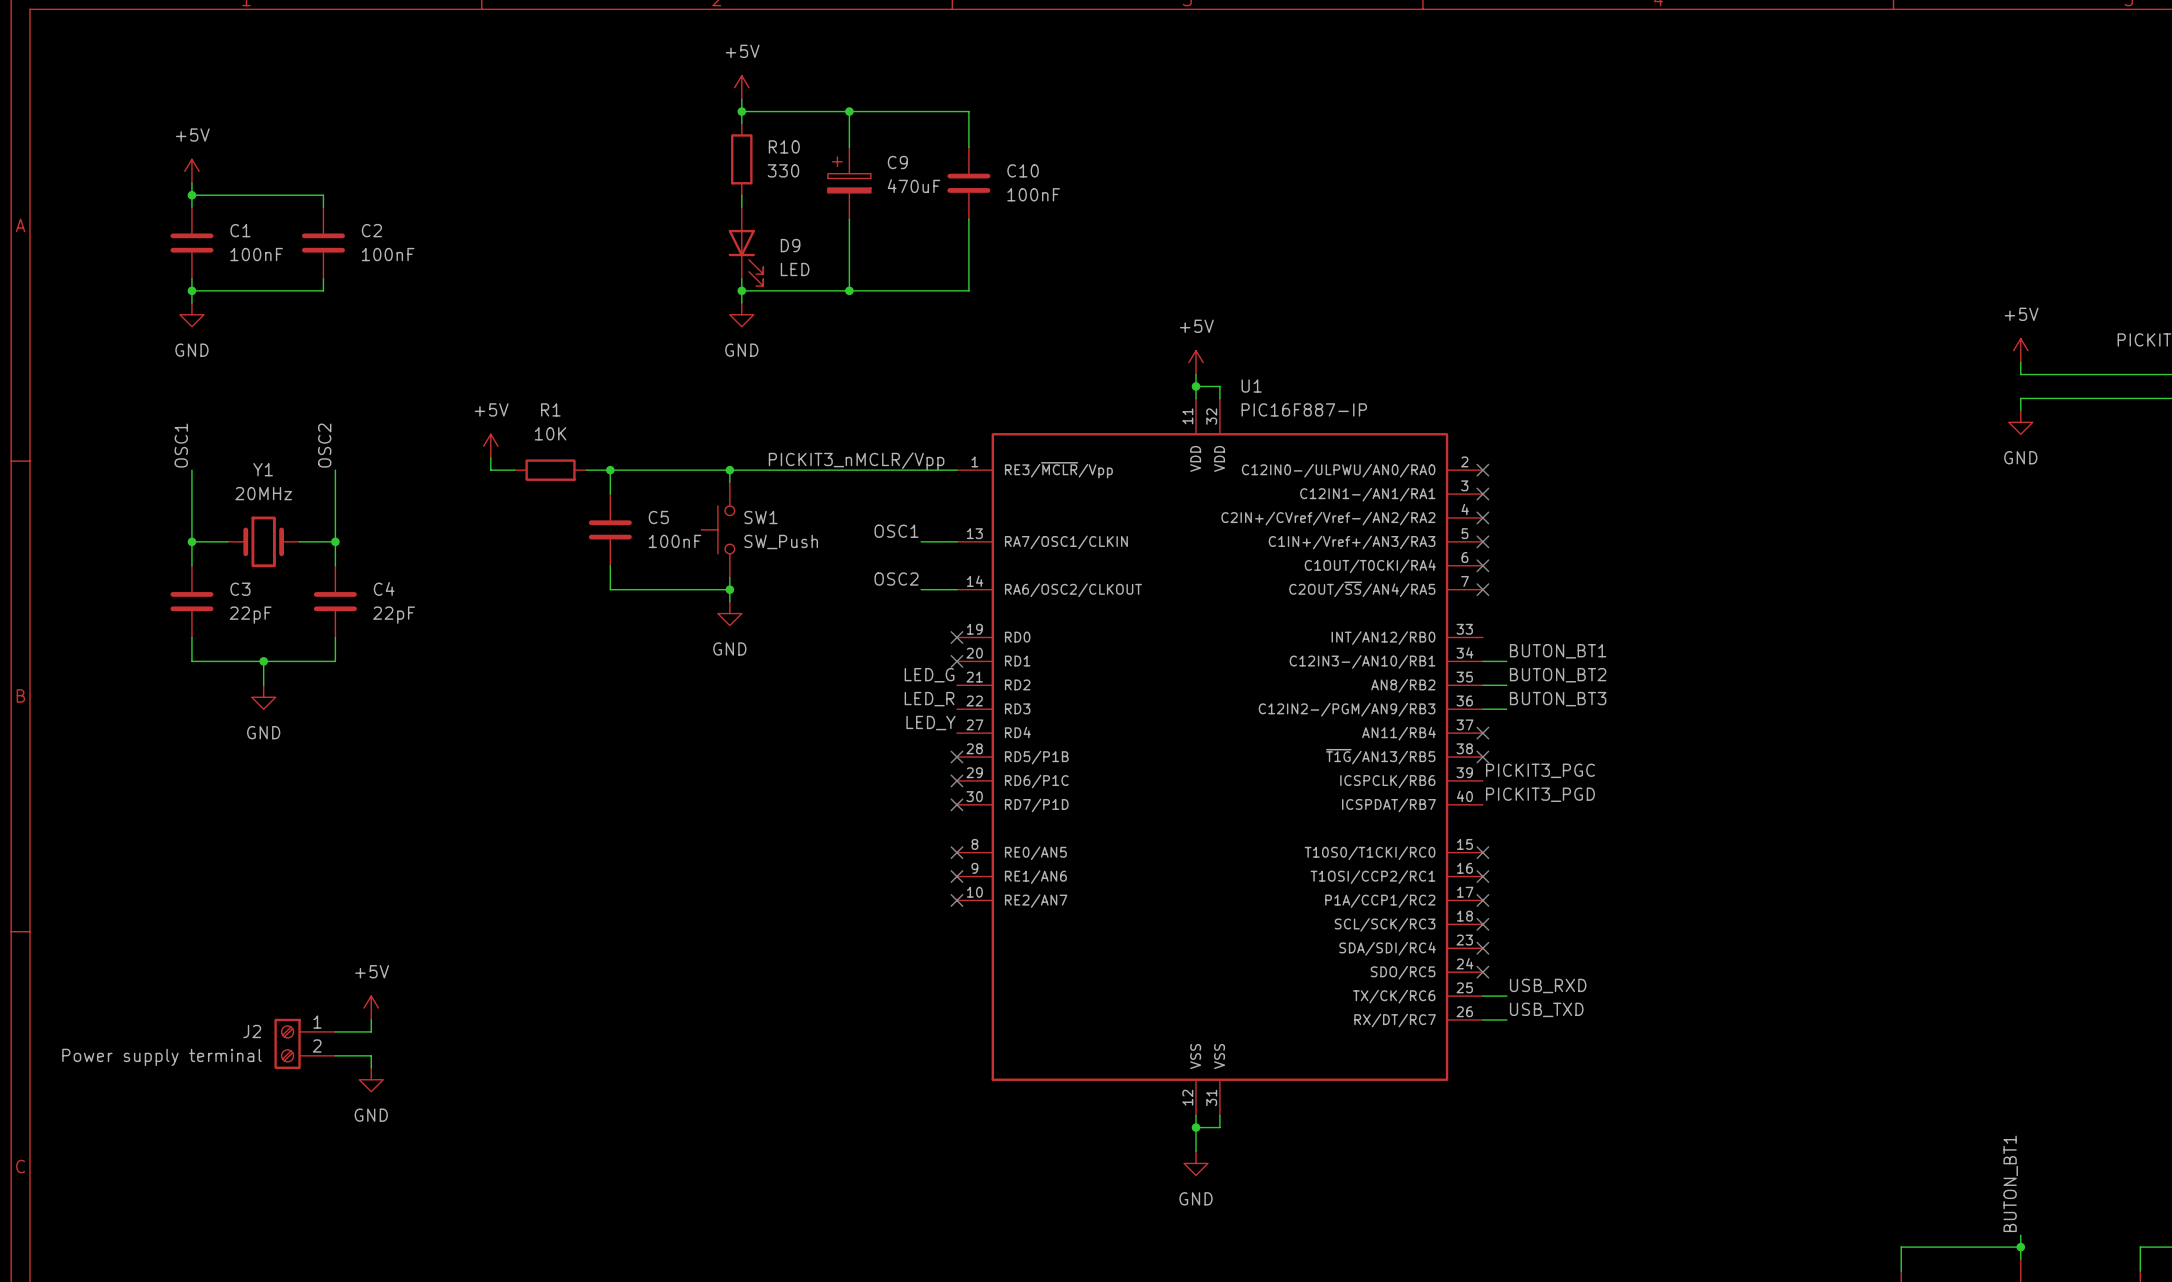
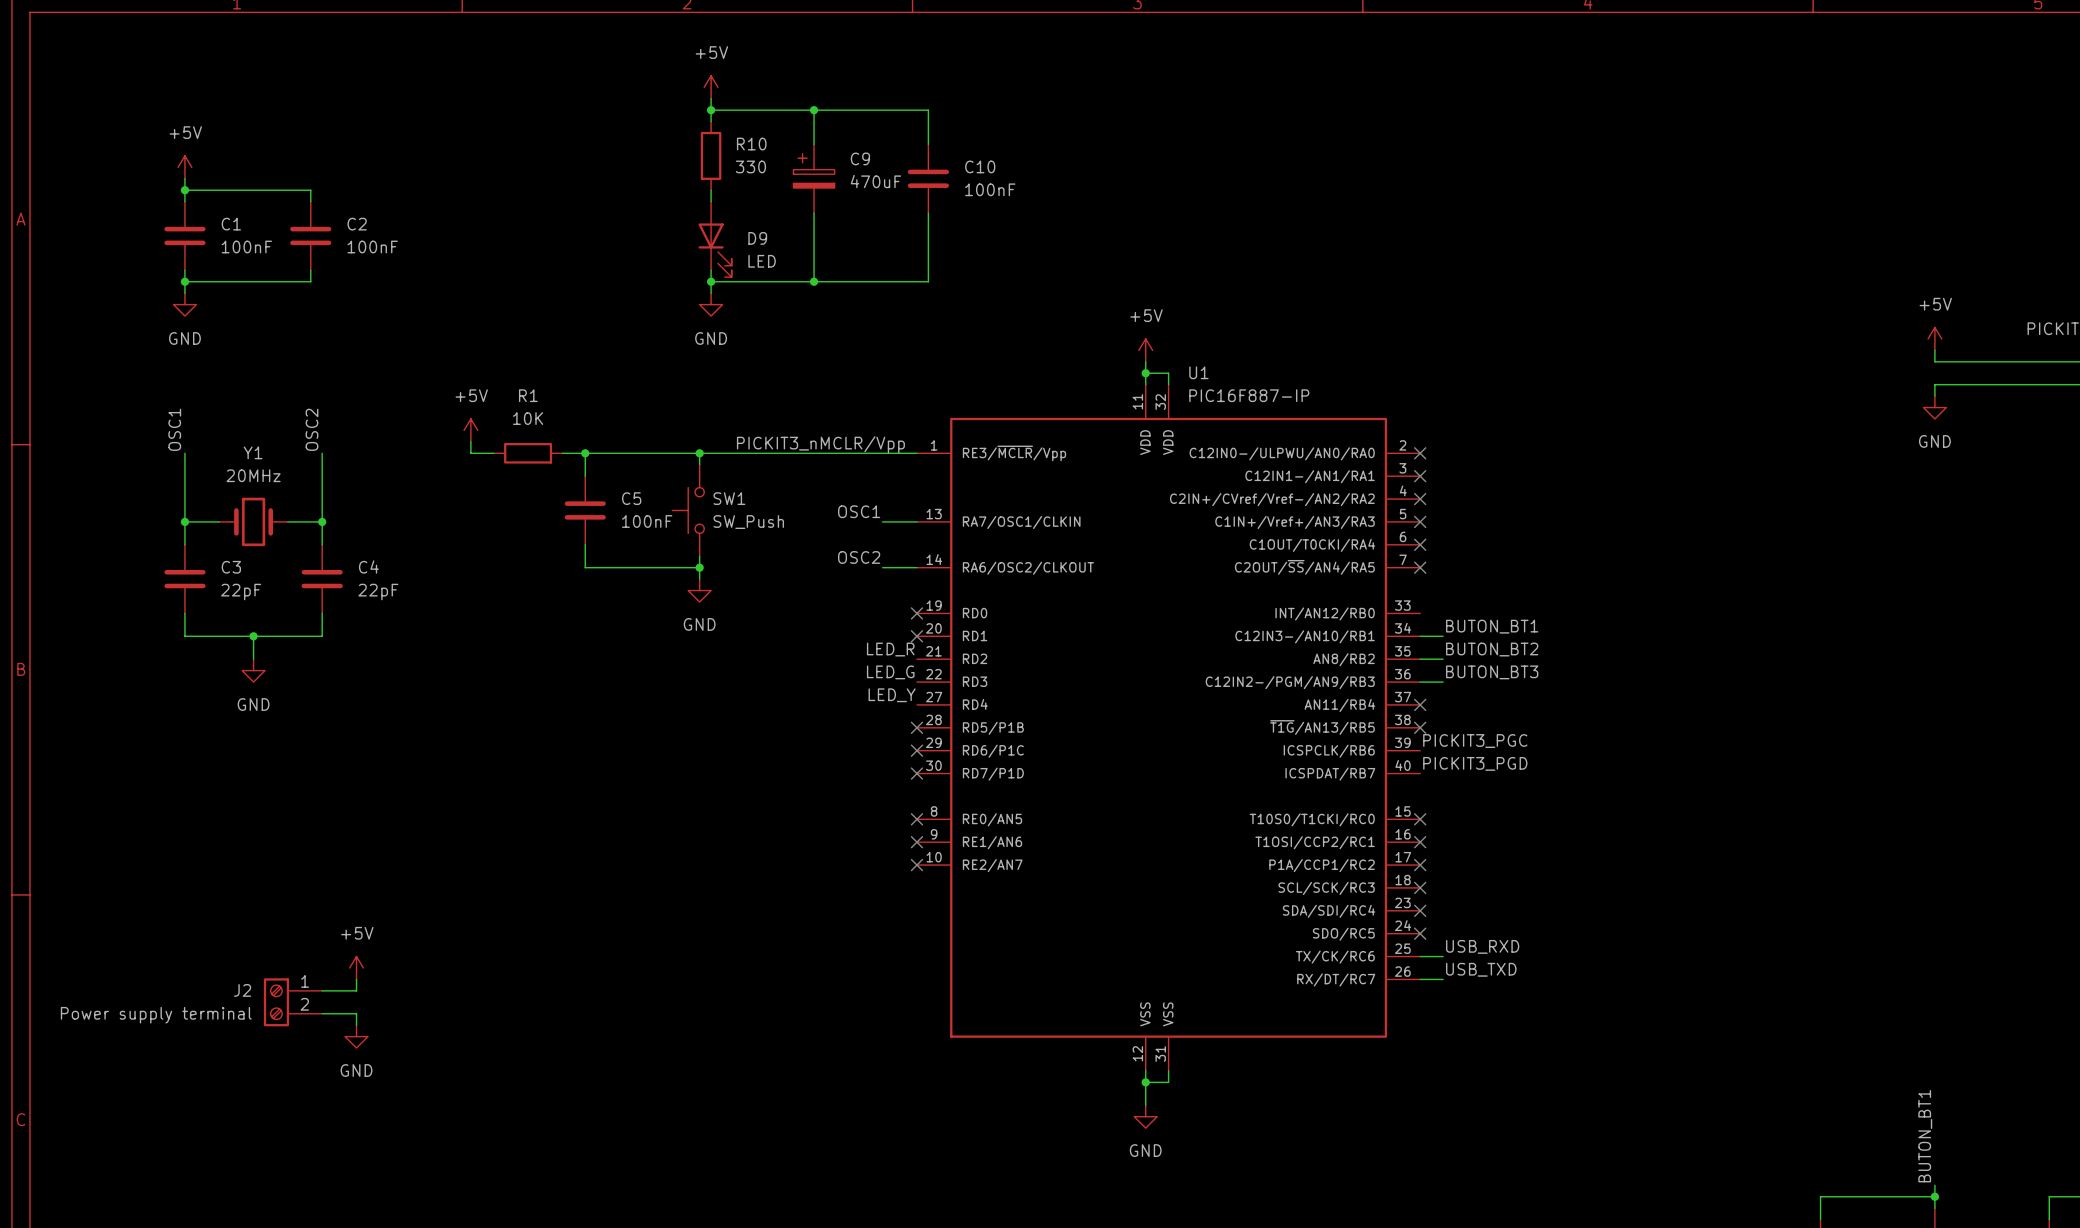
label: LED_G (929, 675) -> LED_R (890, 649)
label: LED_R (929, 699) -> LED_G (890, 672)

